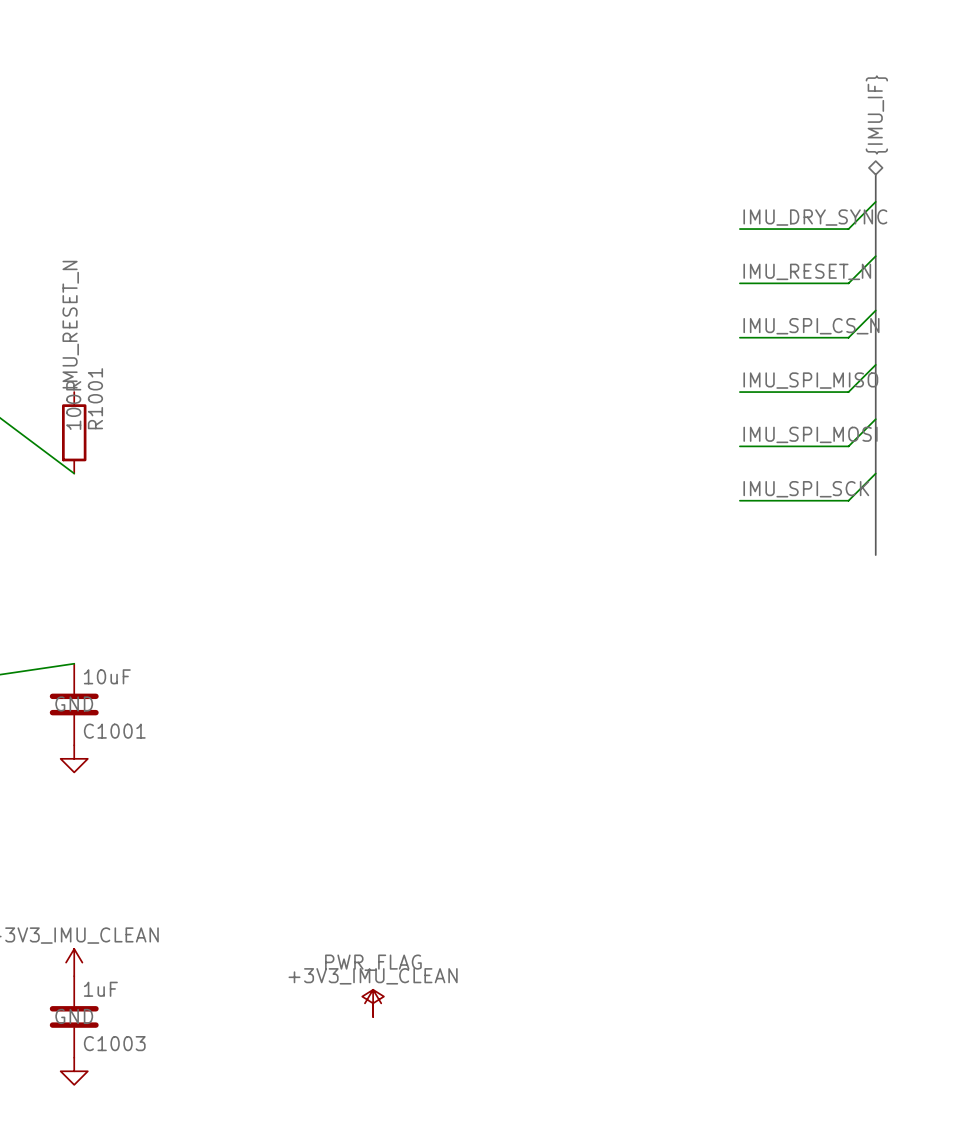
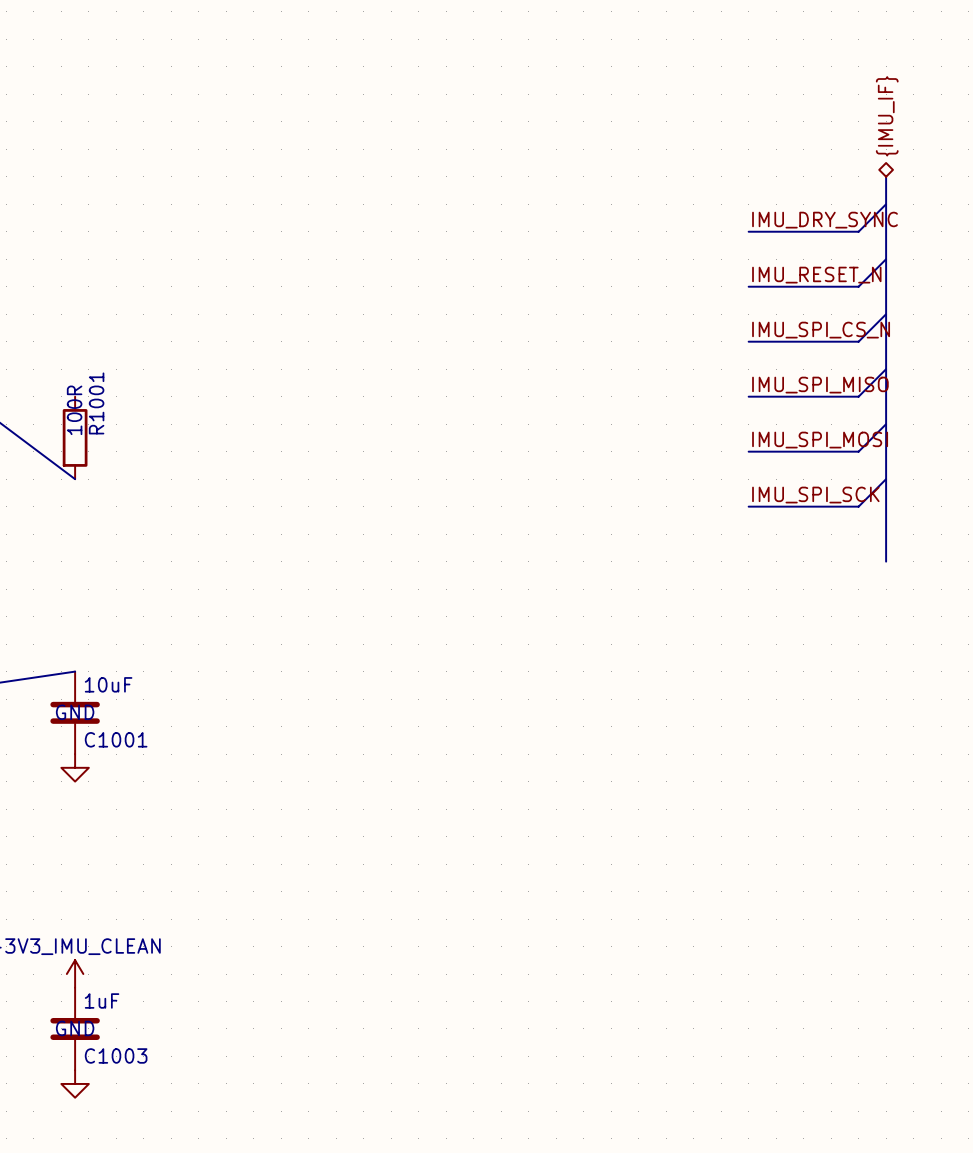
label: IMU_RESET_N (70, 324) -> none
power symbol: PWR_FLAG (373, 1003) -> none
power symbol: +3V3_IMU_CLEAN (373, 1003) -> none

